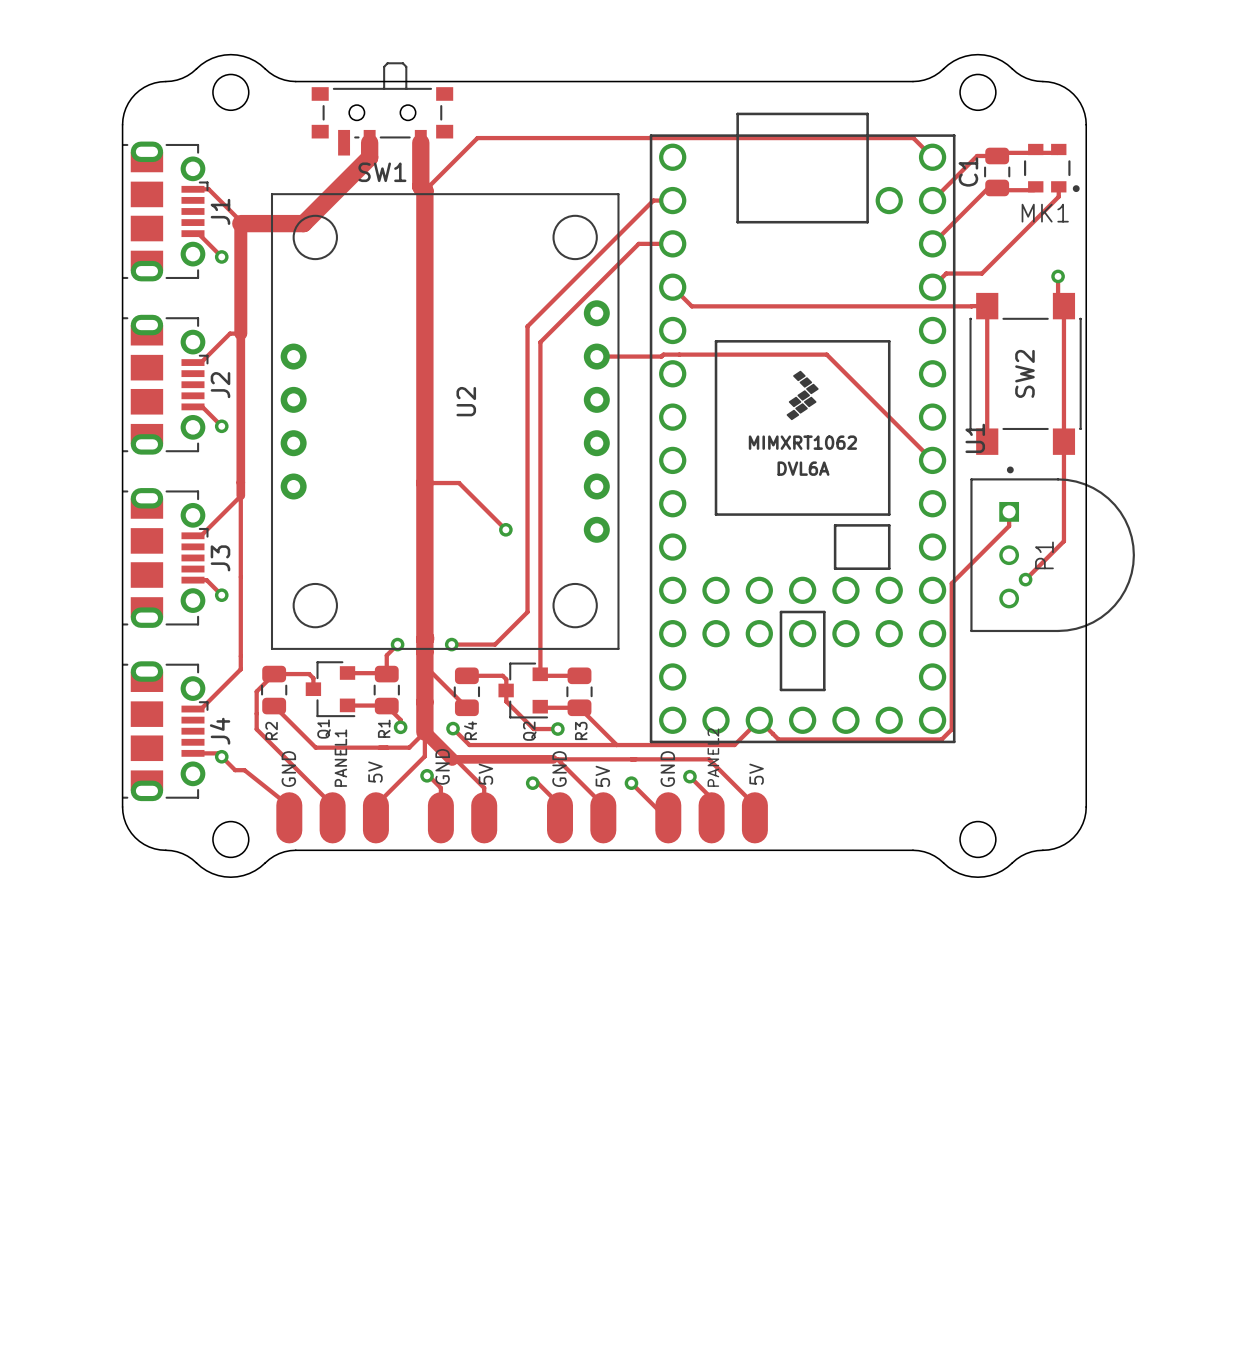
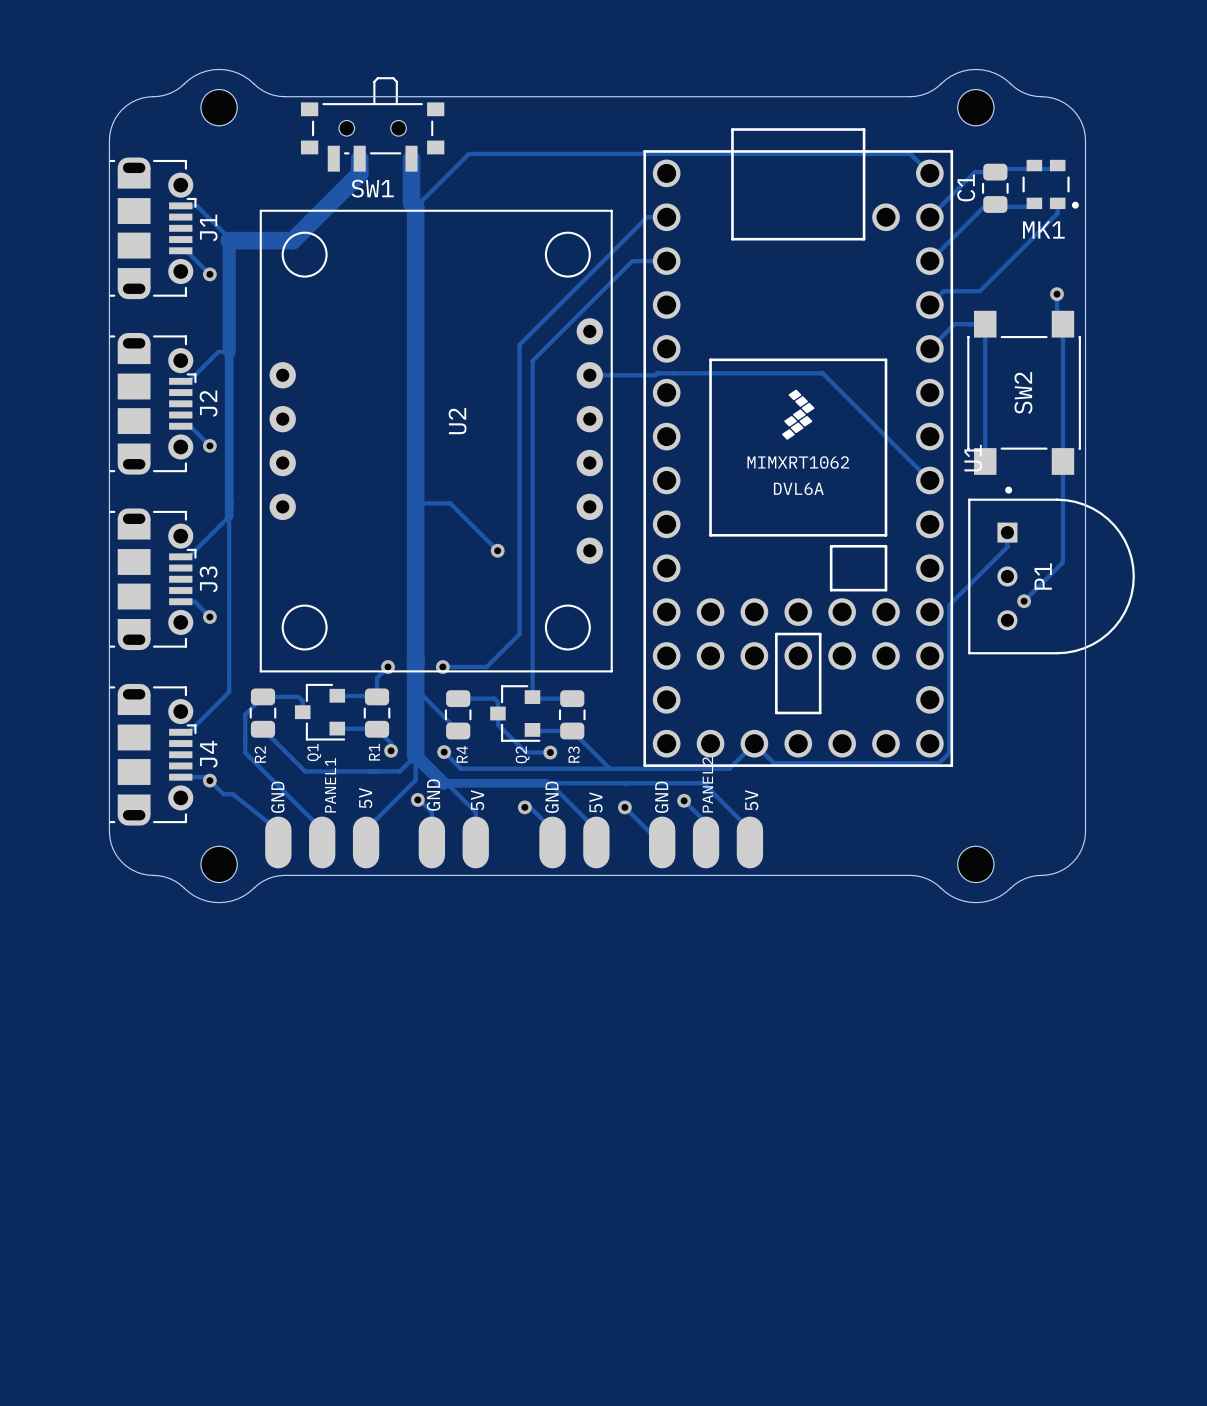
track: (672, 287) (691, 306) (971, 306) -> (929, 348) (954, 324) (969, 324)

